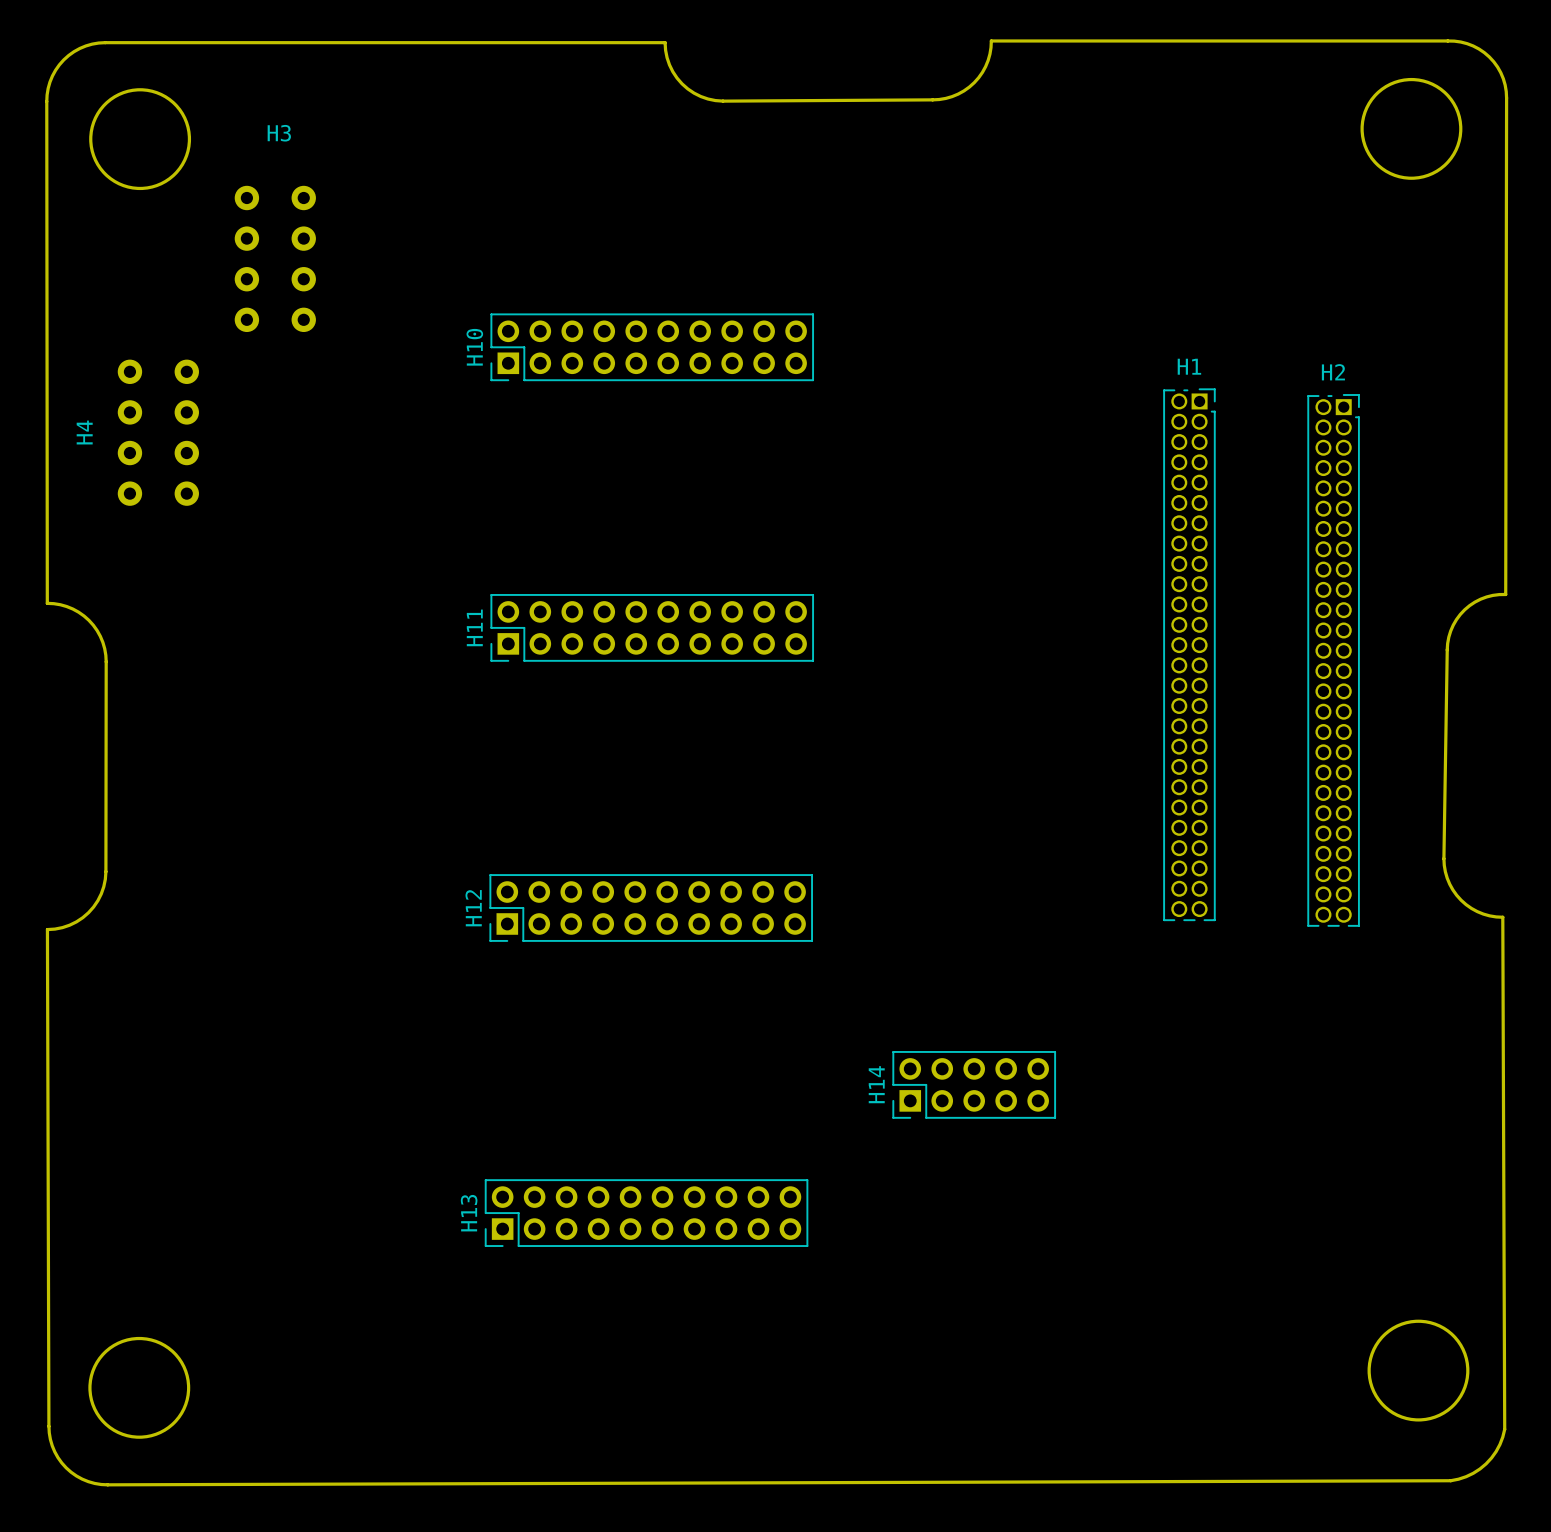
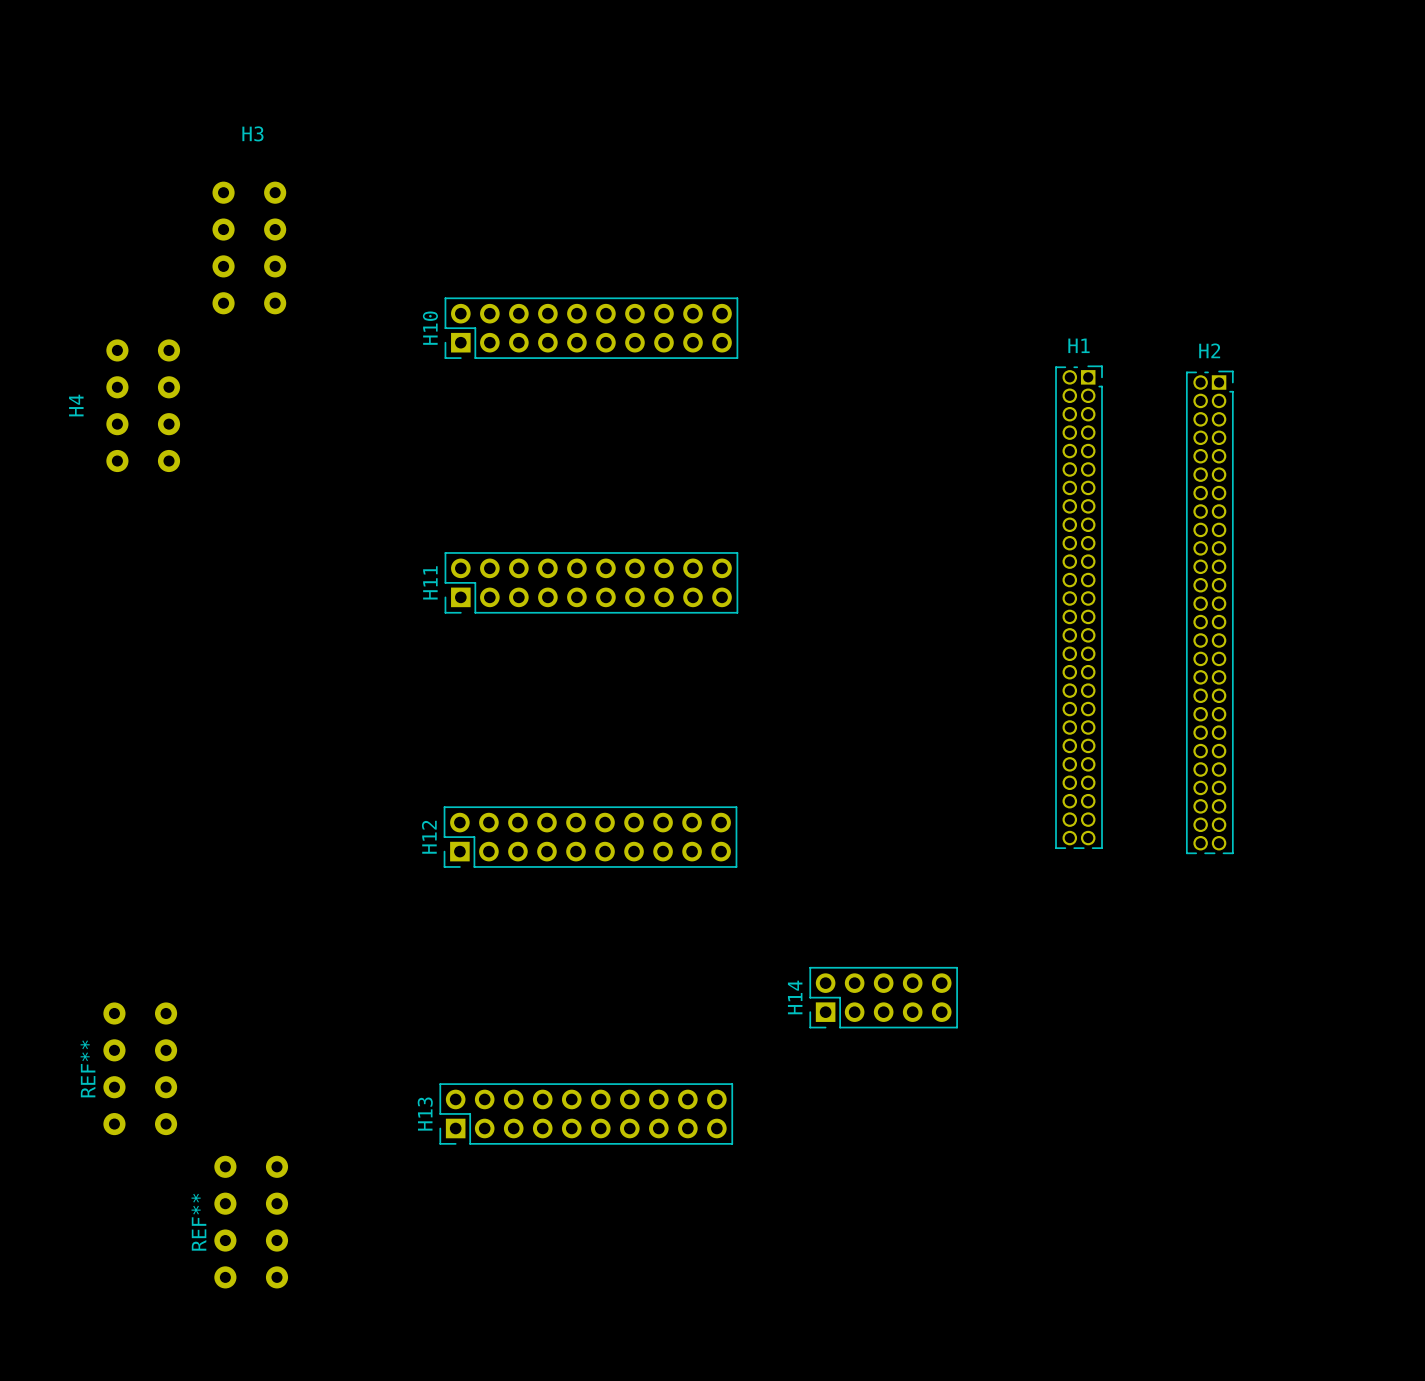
board edge: (991, 40) (1454, 41) (1467, 43) (1484, 52) (1493, 61) (1503, 78) (1506, 98) (1505, 594) (1486, 596) (1469, 605) (1456, 619) (1448, 637) (1443, 858) (1447, 878) (1461, 900) (1477, 911) (1502, 917) (1504, 1429) (1496, 1451) (1486, 1463) (1473, 1473) (1450, 1480) (107, 1484) (94, 1483) (76, 1476) (61, 1462) (54, 1451) (48, 1426) (47, 929) (62, 927) (82, 917) (97, 900) (103, 886) (105, 871) (106, 661) (102, 642) (88, 620) (66, 606) (47, 603) (46, 101) (49, 82) (55, 70) (63, 59) (79, 48) (105, 42) (665, 42) (667, 57) (677, 78) (694, 93) (707, 99) (723, 101) (932, 99) (958, 94) (974, 82) (988, 60) (991, 40) -> none
round board edge: [1360, 77, 1463, 180] -> none
round board edge: [89, 88, 192, 191] -> none
REF**: none -> (140, 1068)
round board edge: [1367, 1319, 1470, 1422] -> none
REF**: none -> (251, 1222)
round board edge: [88, 1336, 191, 1439] -> none

